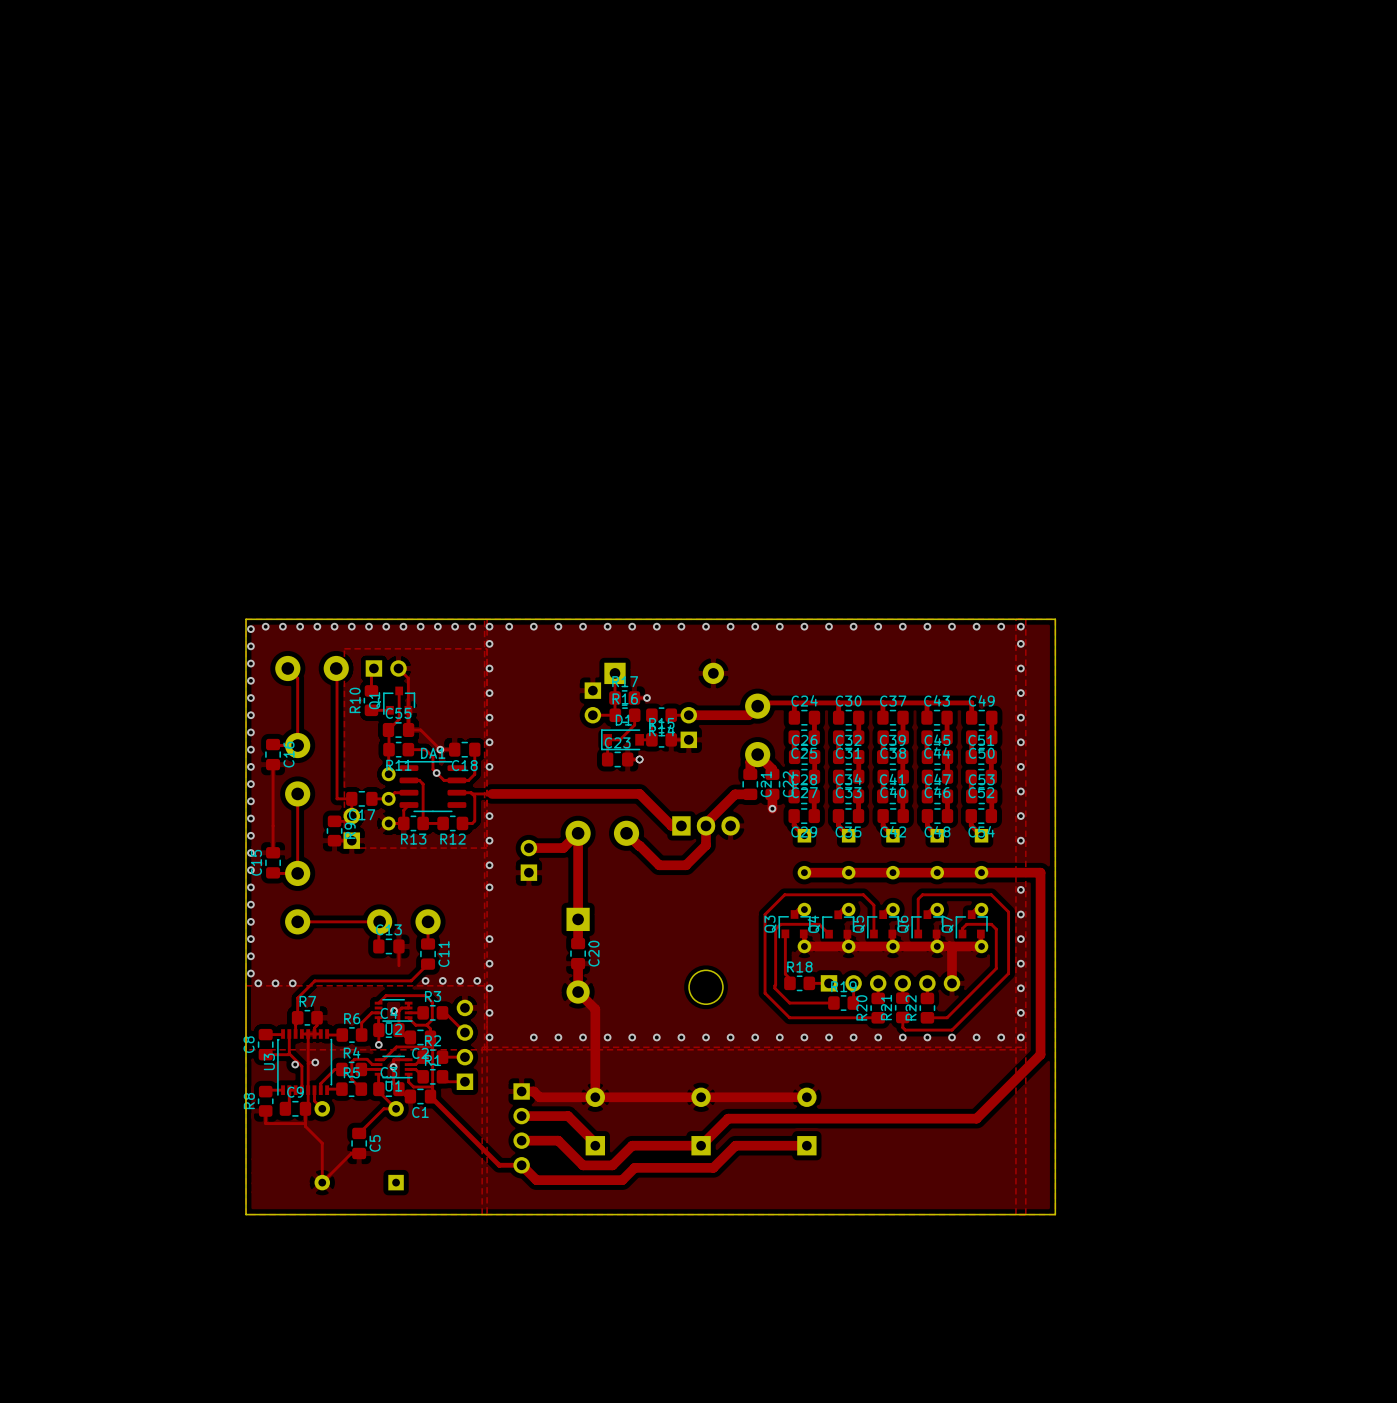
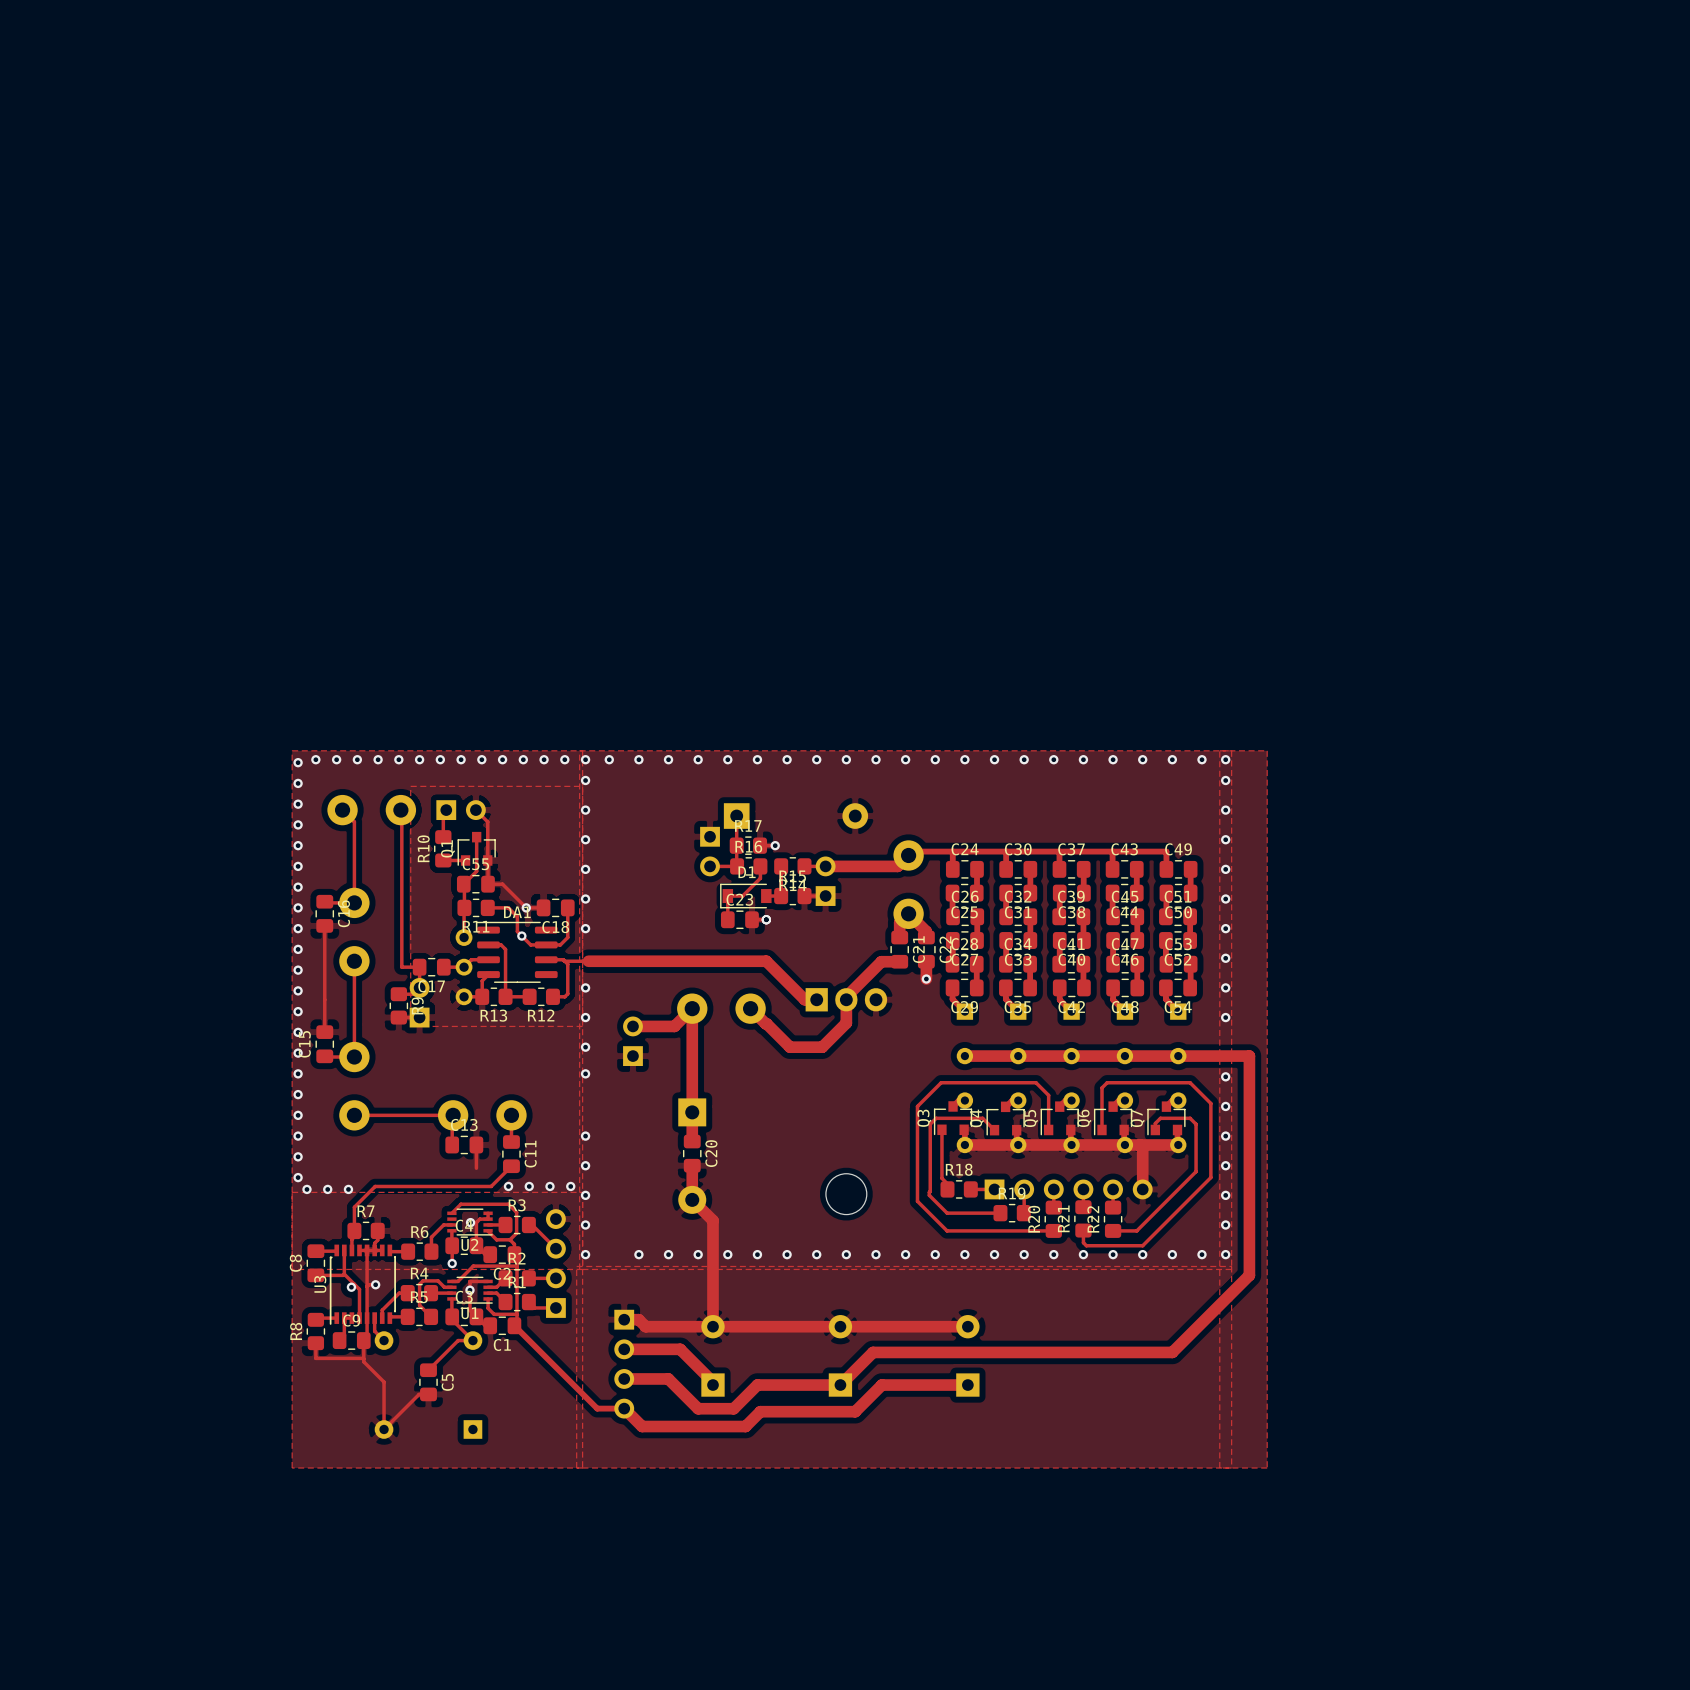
board edge: (246, 619) (1055, 619) (1055, 1214) (246, 1214) (246, 619) -> none

